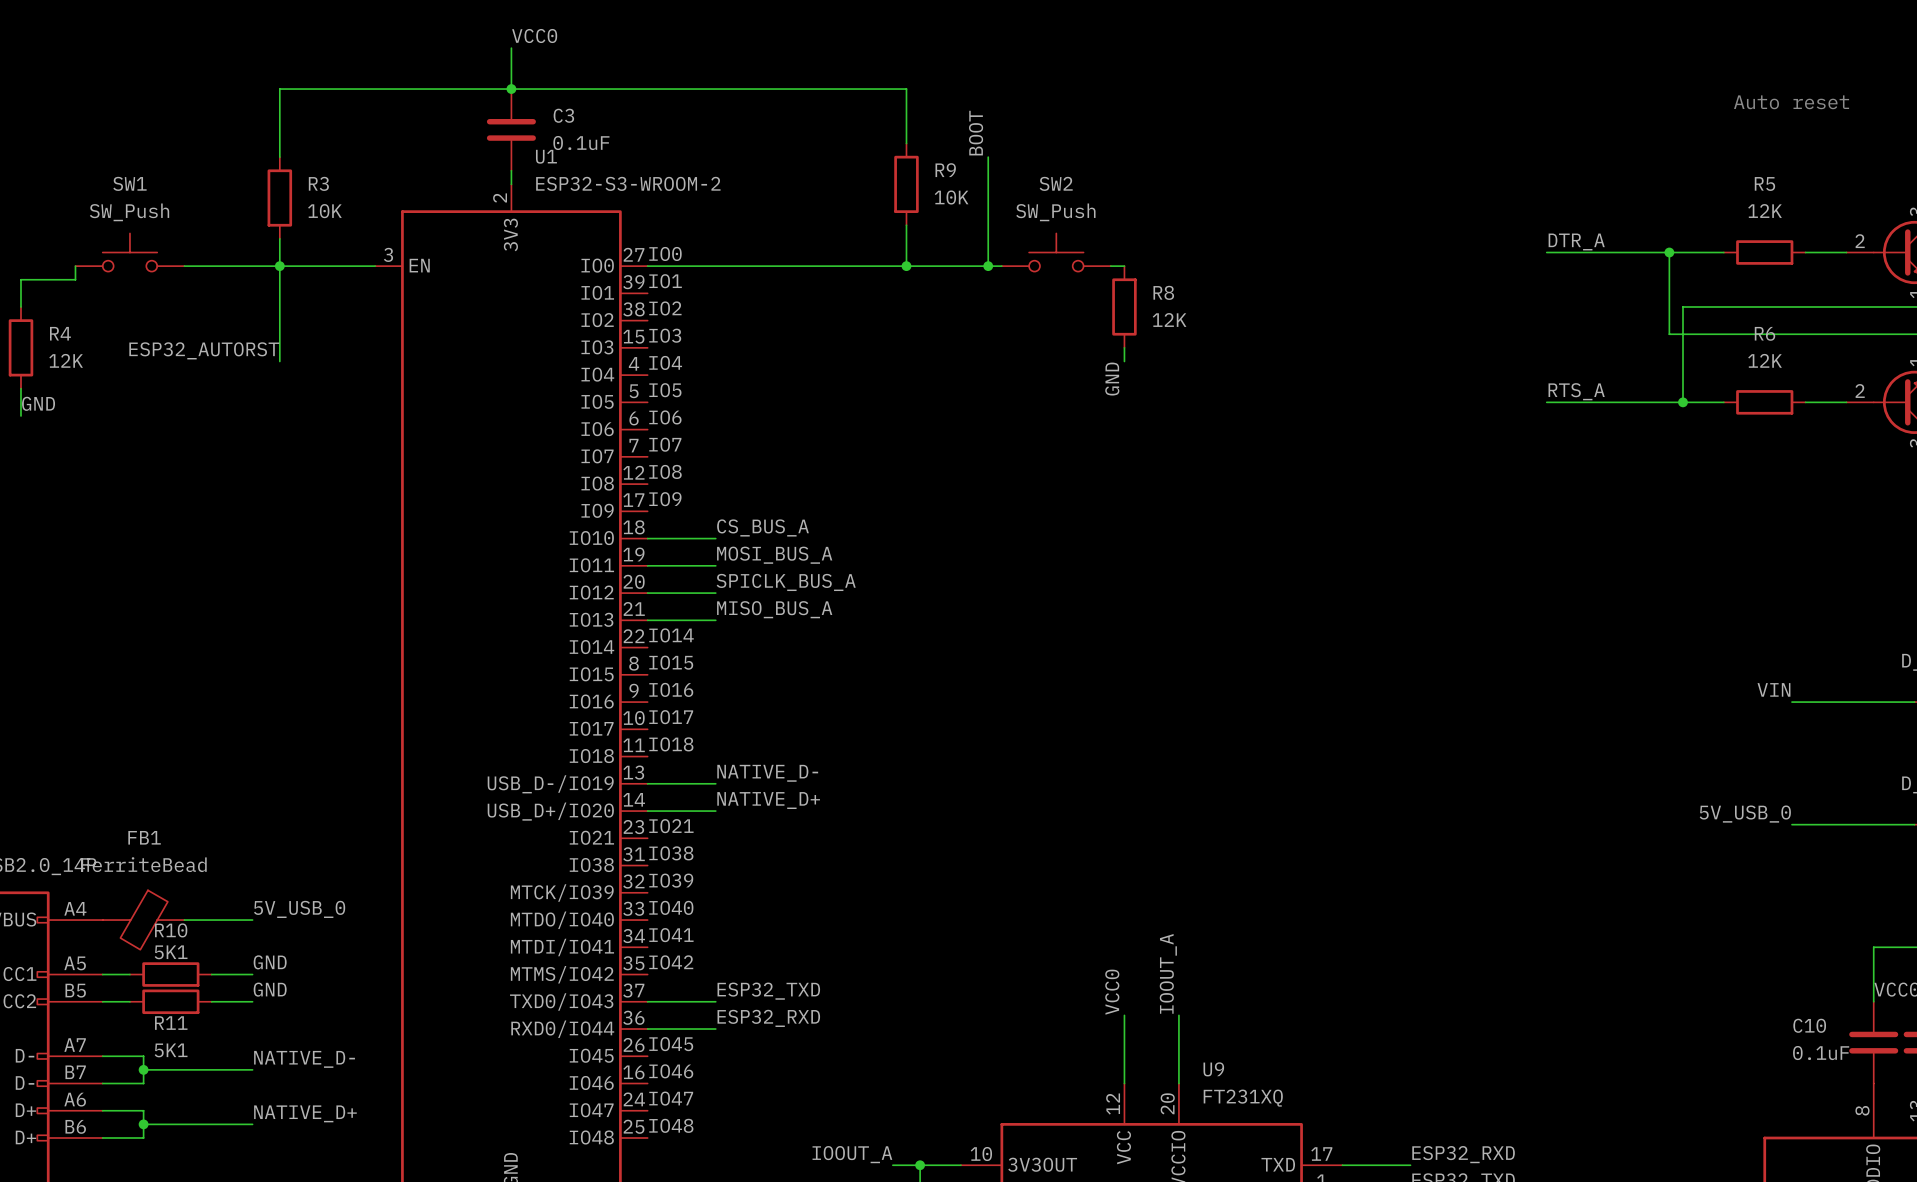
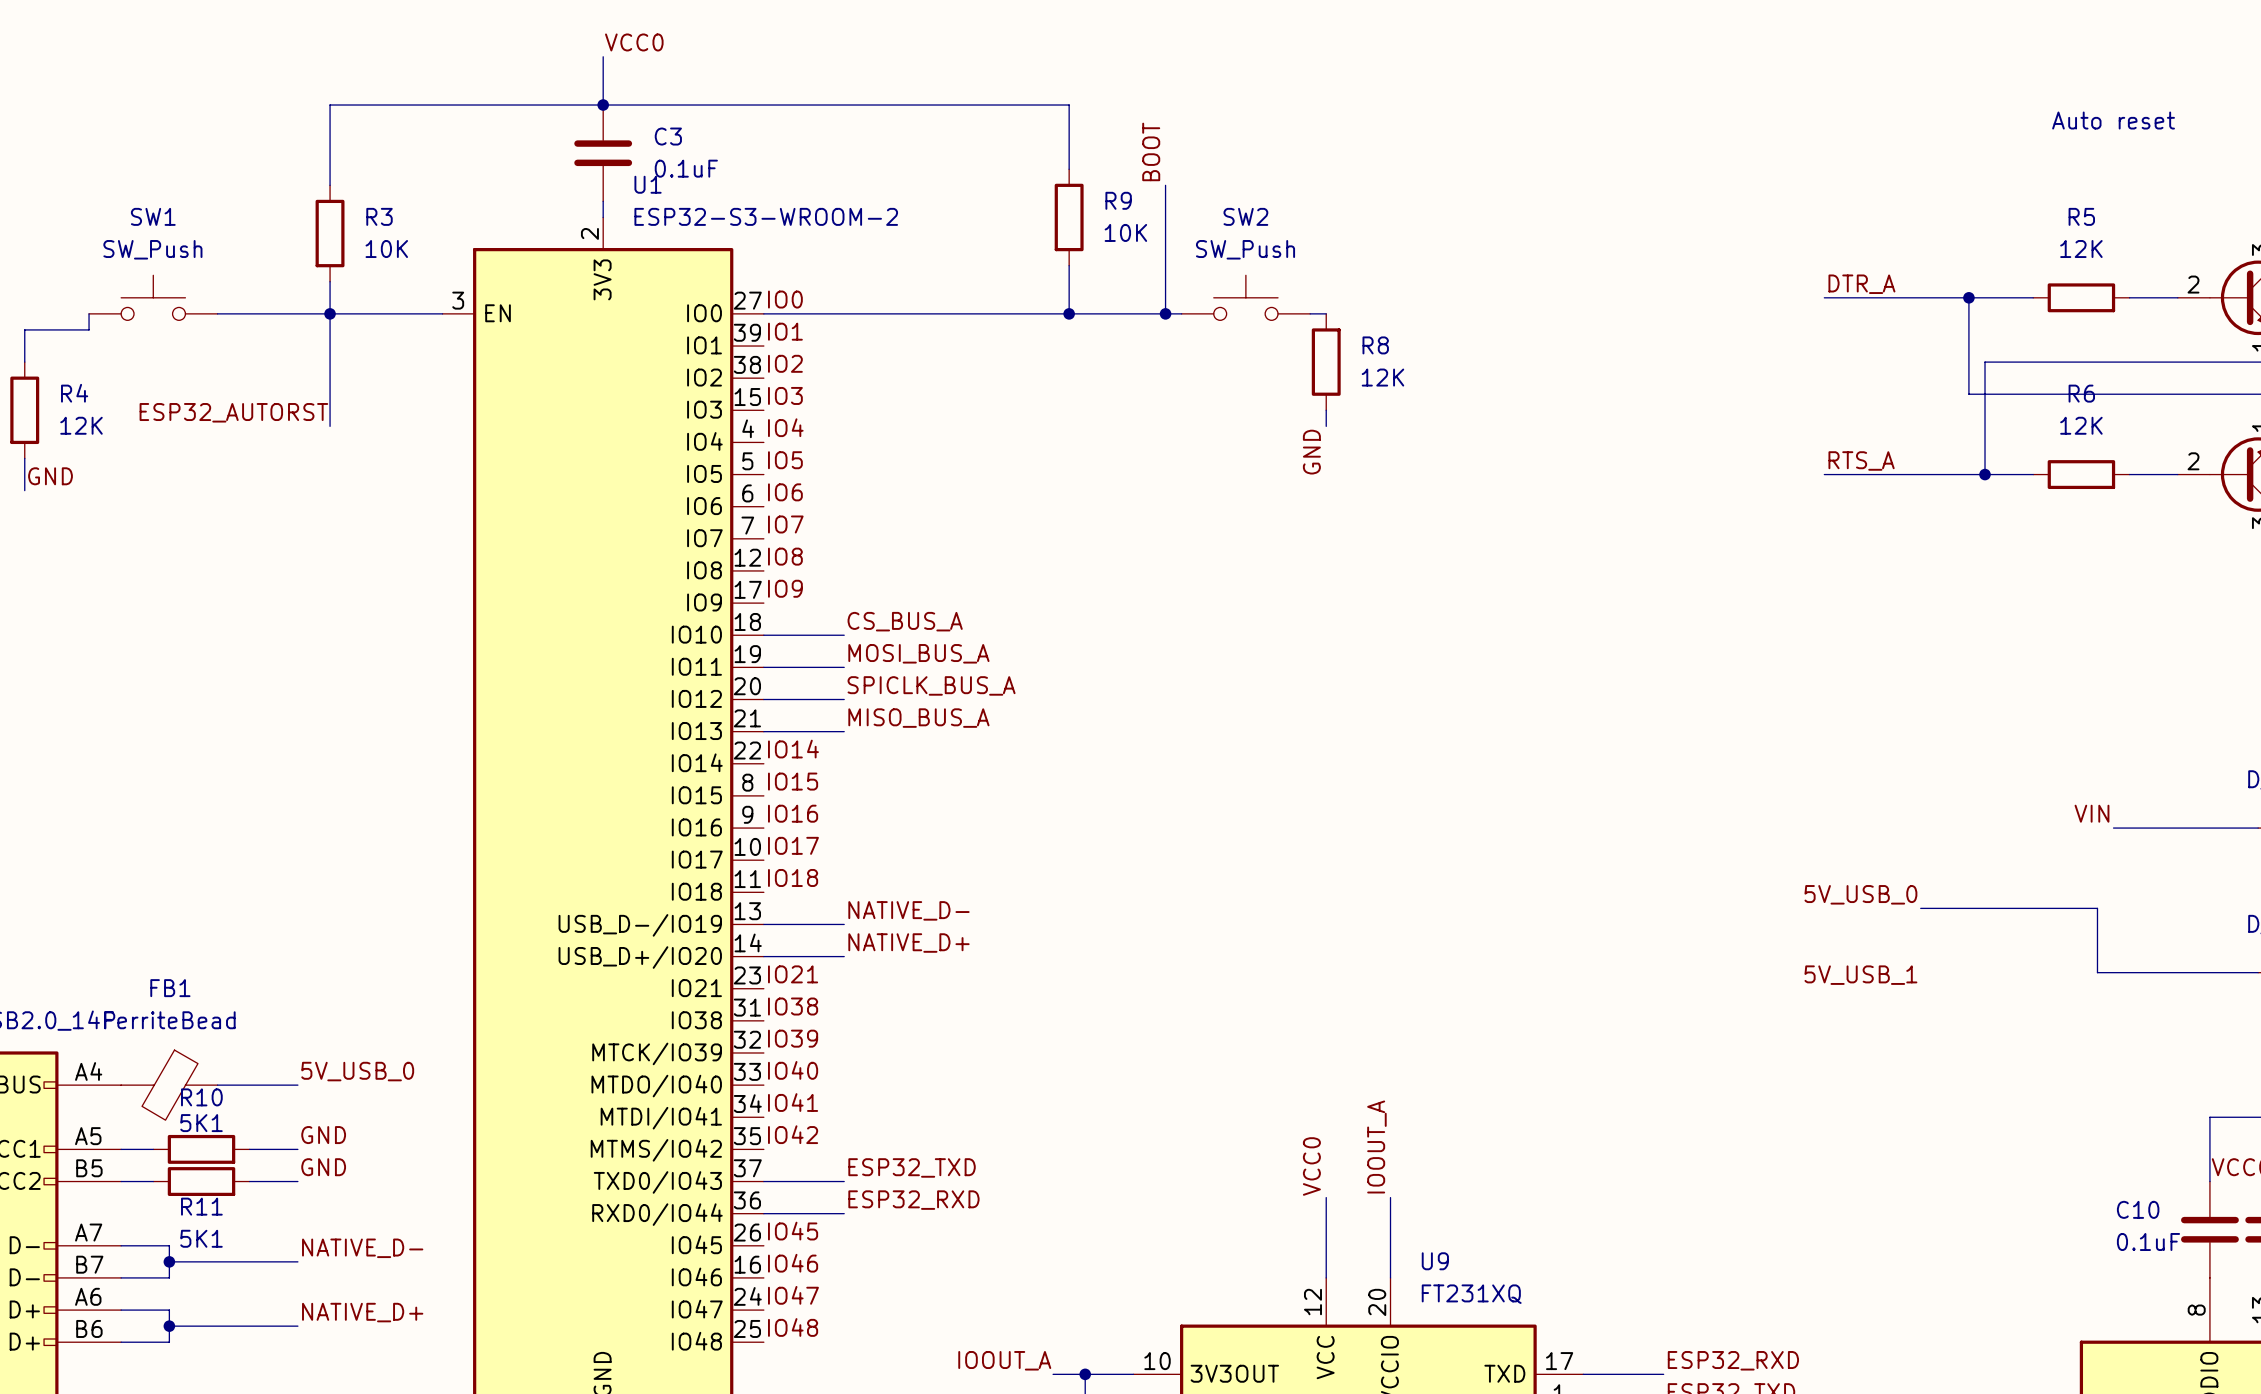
wire: none -> (1920, 908) (2097, 908) (2097, 972) (2113, 972)
label position: 5V_USB_0 (1745, 814) -> 5V_USB_0 (1860, 894)
label: none -> 5V_USB_1 (1860, 975)

